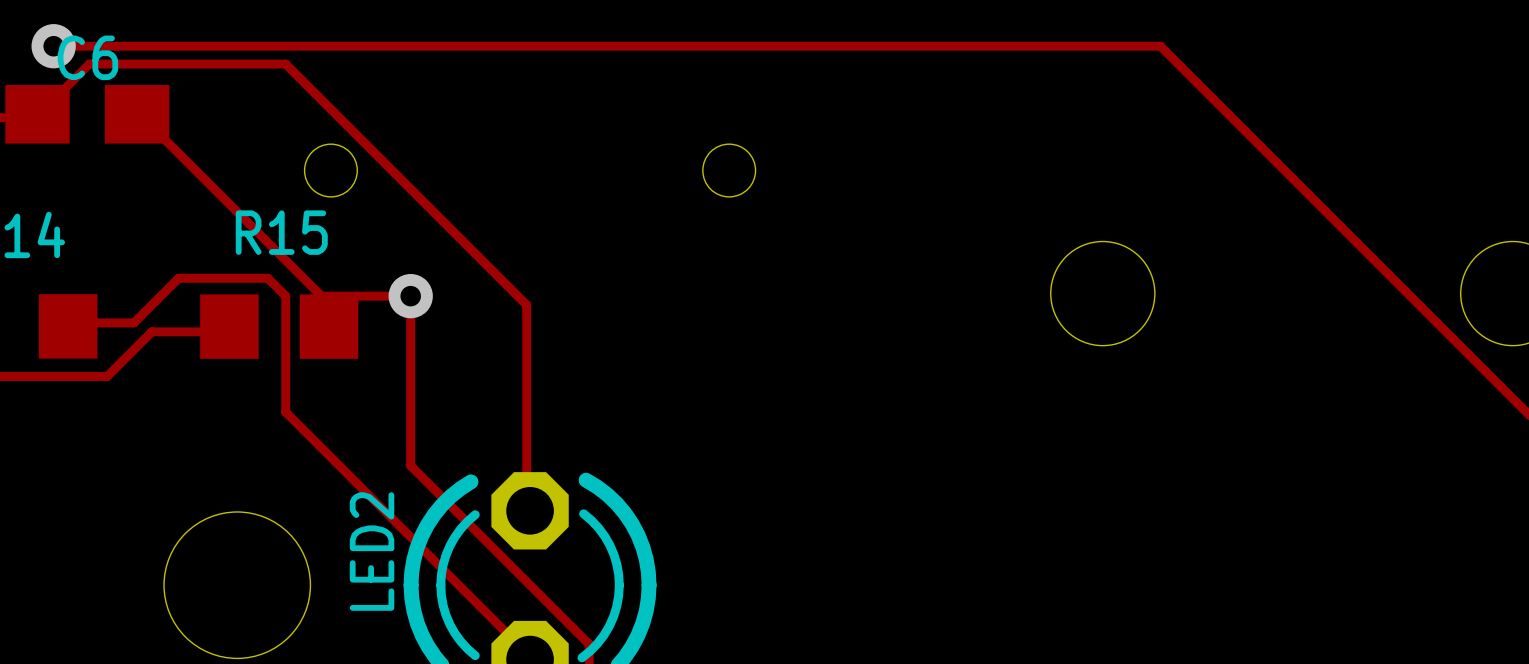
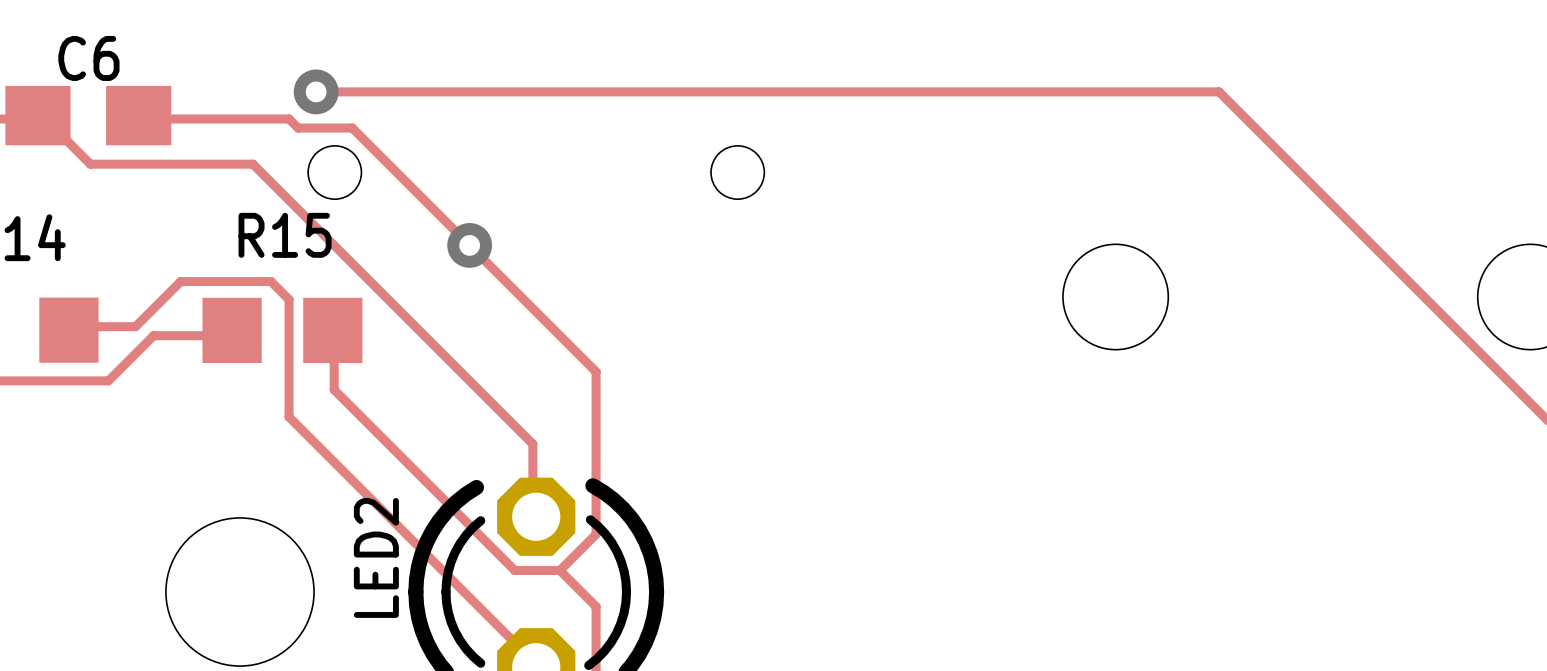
track: (53, 46) (1160, 46) (1205, 90) -> (316, 91) (1219, 91)
via: (53, 46) -> none
via: none -> (316, 91)
track: (37, 114) (89, 64) (285, 64) (348, 126) -> (144, 119) (289, 119) (298, 128) (352, 128)
track: none -> (37, 115) (45, 119) (90, 164) (252, 164) (532, 444)
track: (142, 117) (321, 296) -> none
track: (321, 296) (410, 296) (410, 465) -> (332, 330) (334, 389) (415, 471)
via position: (410, 296) -> (469, 245)
track: (526, 305) (526, 438) -> (532, 308) (596, 371) (596, 534) (559, 570)
track: (508, 563) (589, 644) -> (559, 570) (596, 606) (596, 651)
track: none -> (514, 570) (559, 570)

